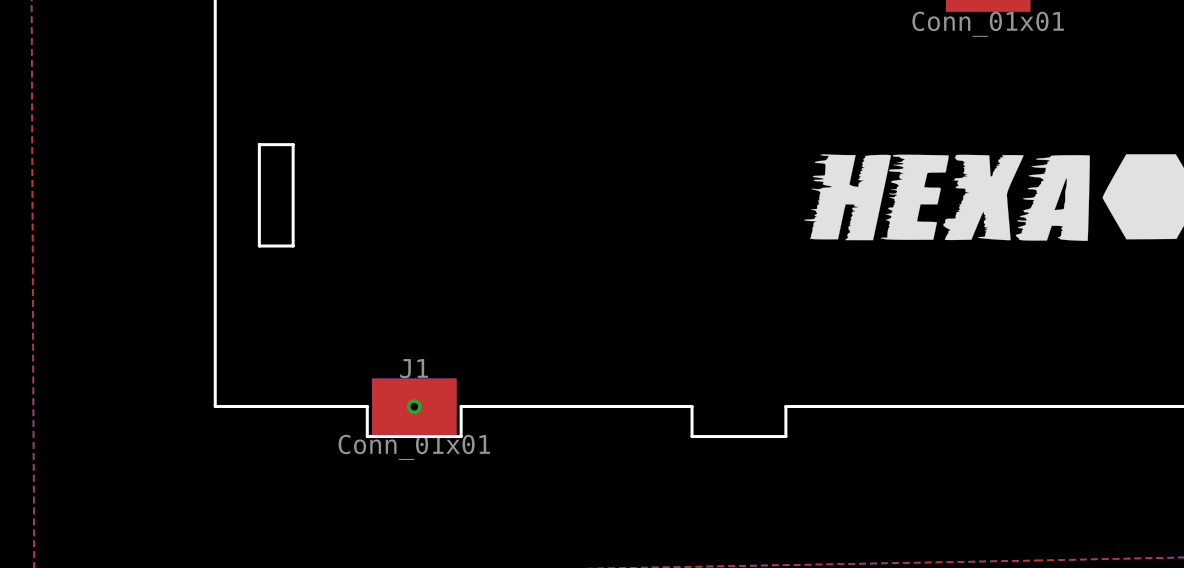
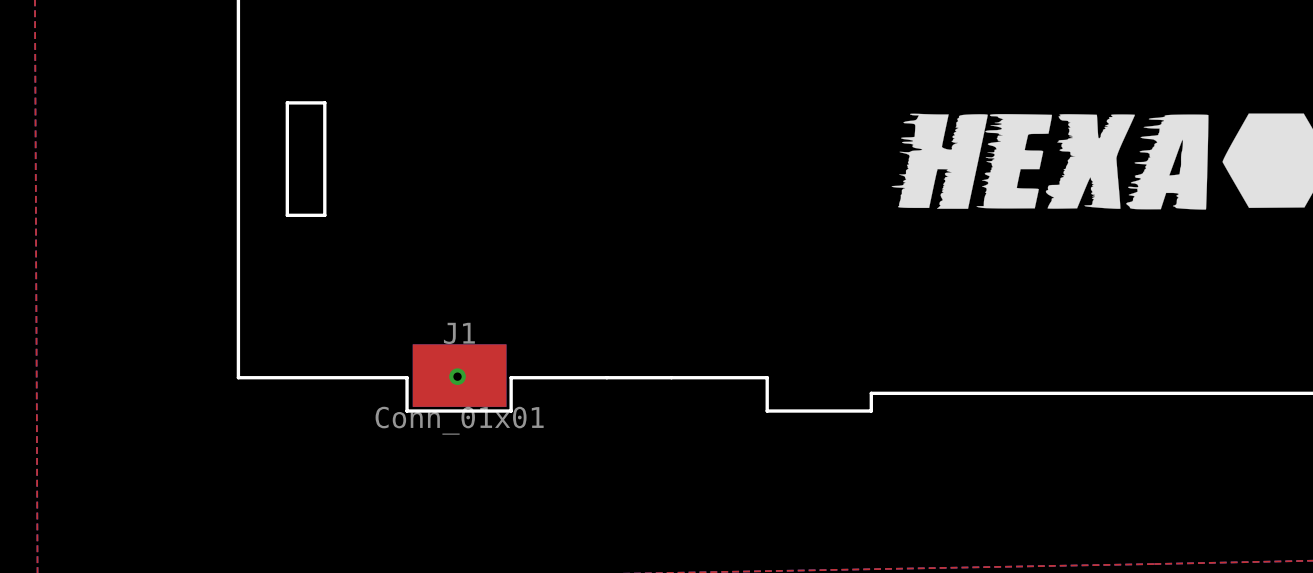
board edge: (215, 392) (215, 406) (367, 406) -> (238, 377) (407, 377) (407, 393)
J1 position: (414, 406) -> (459, 375)
via position: (414, 406) -> (457, 376)
board edge: (461, 406) (692, 406) -> (511, 393) (511, 377) (767, 377) (767, 393)
board edge: (367, 422) (367, 436) (461, 436) (461, 422) -> (407, 411) (511, 411)
board edge: (692, 422) (692, 436) (785, 436) (785, 422) -> (767, 411) (871, 411)

